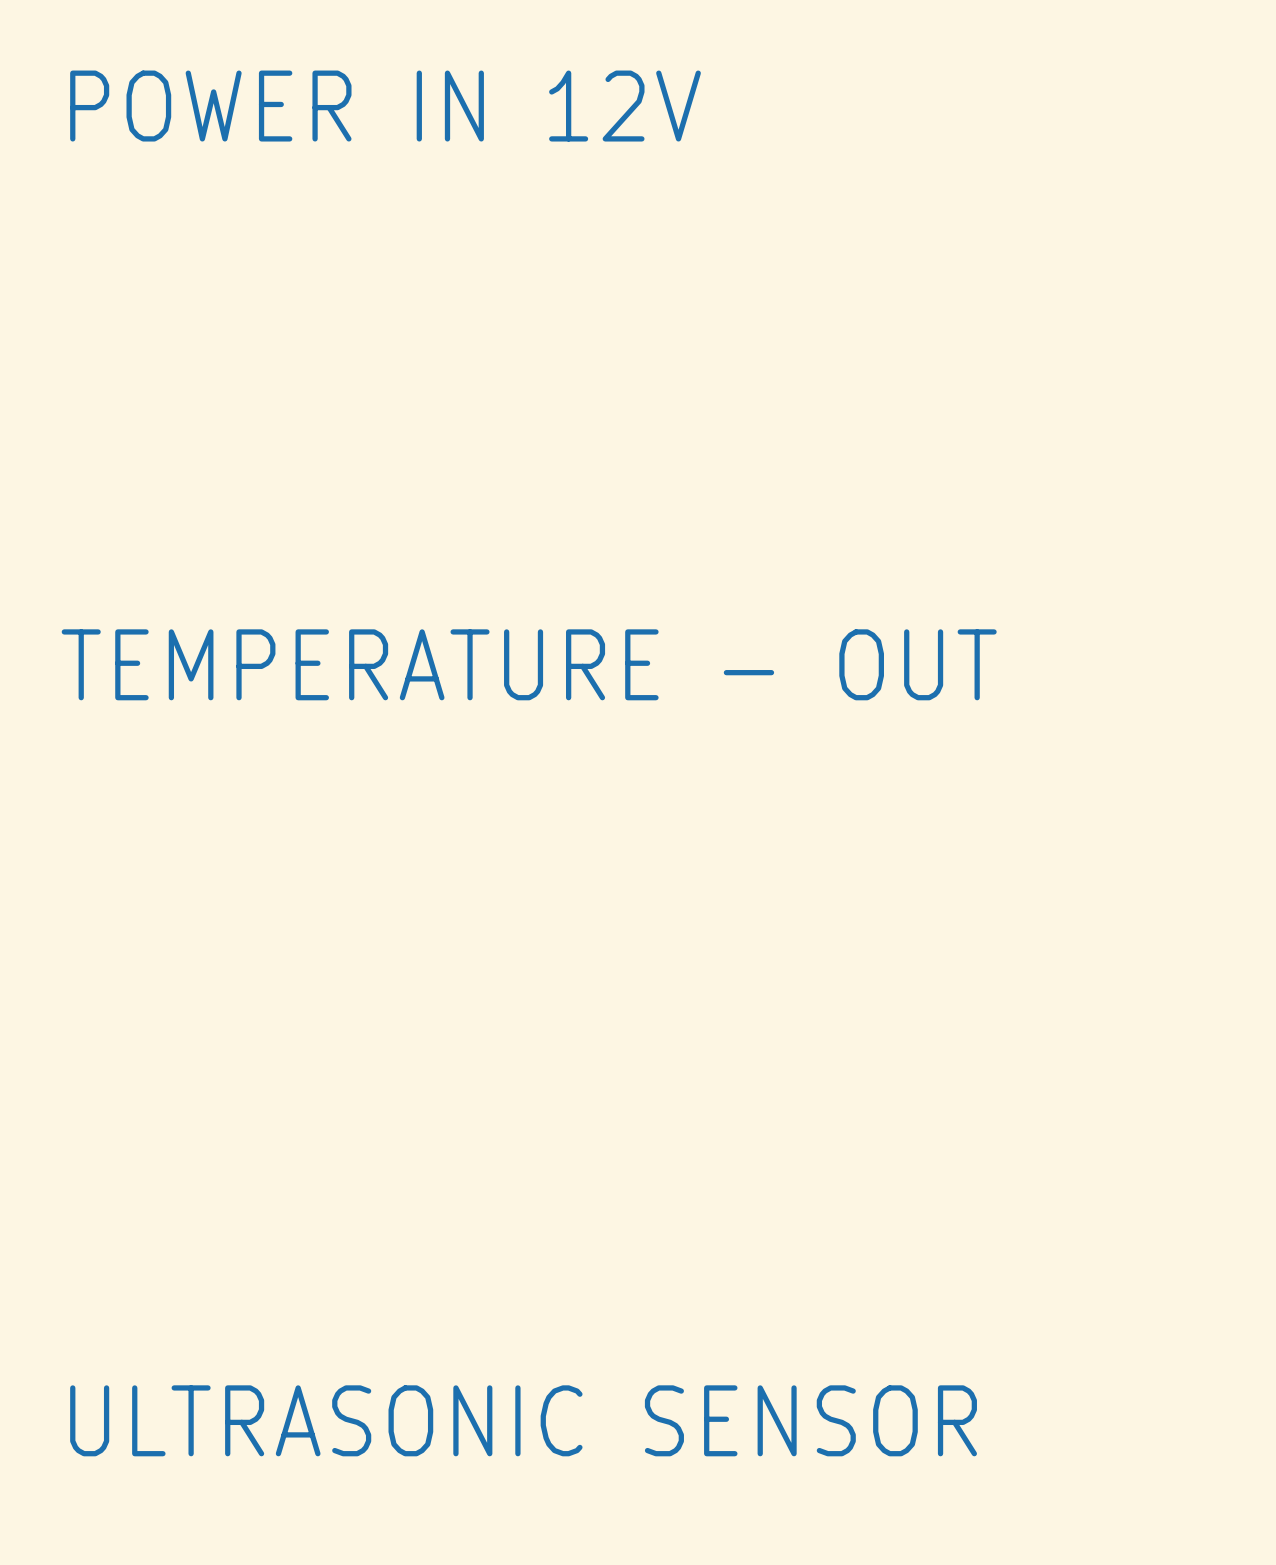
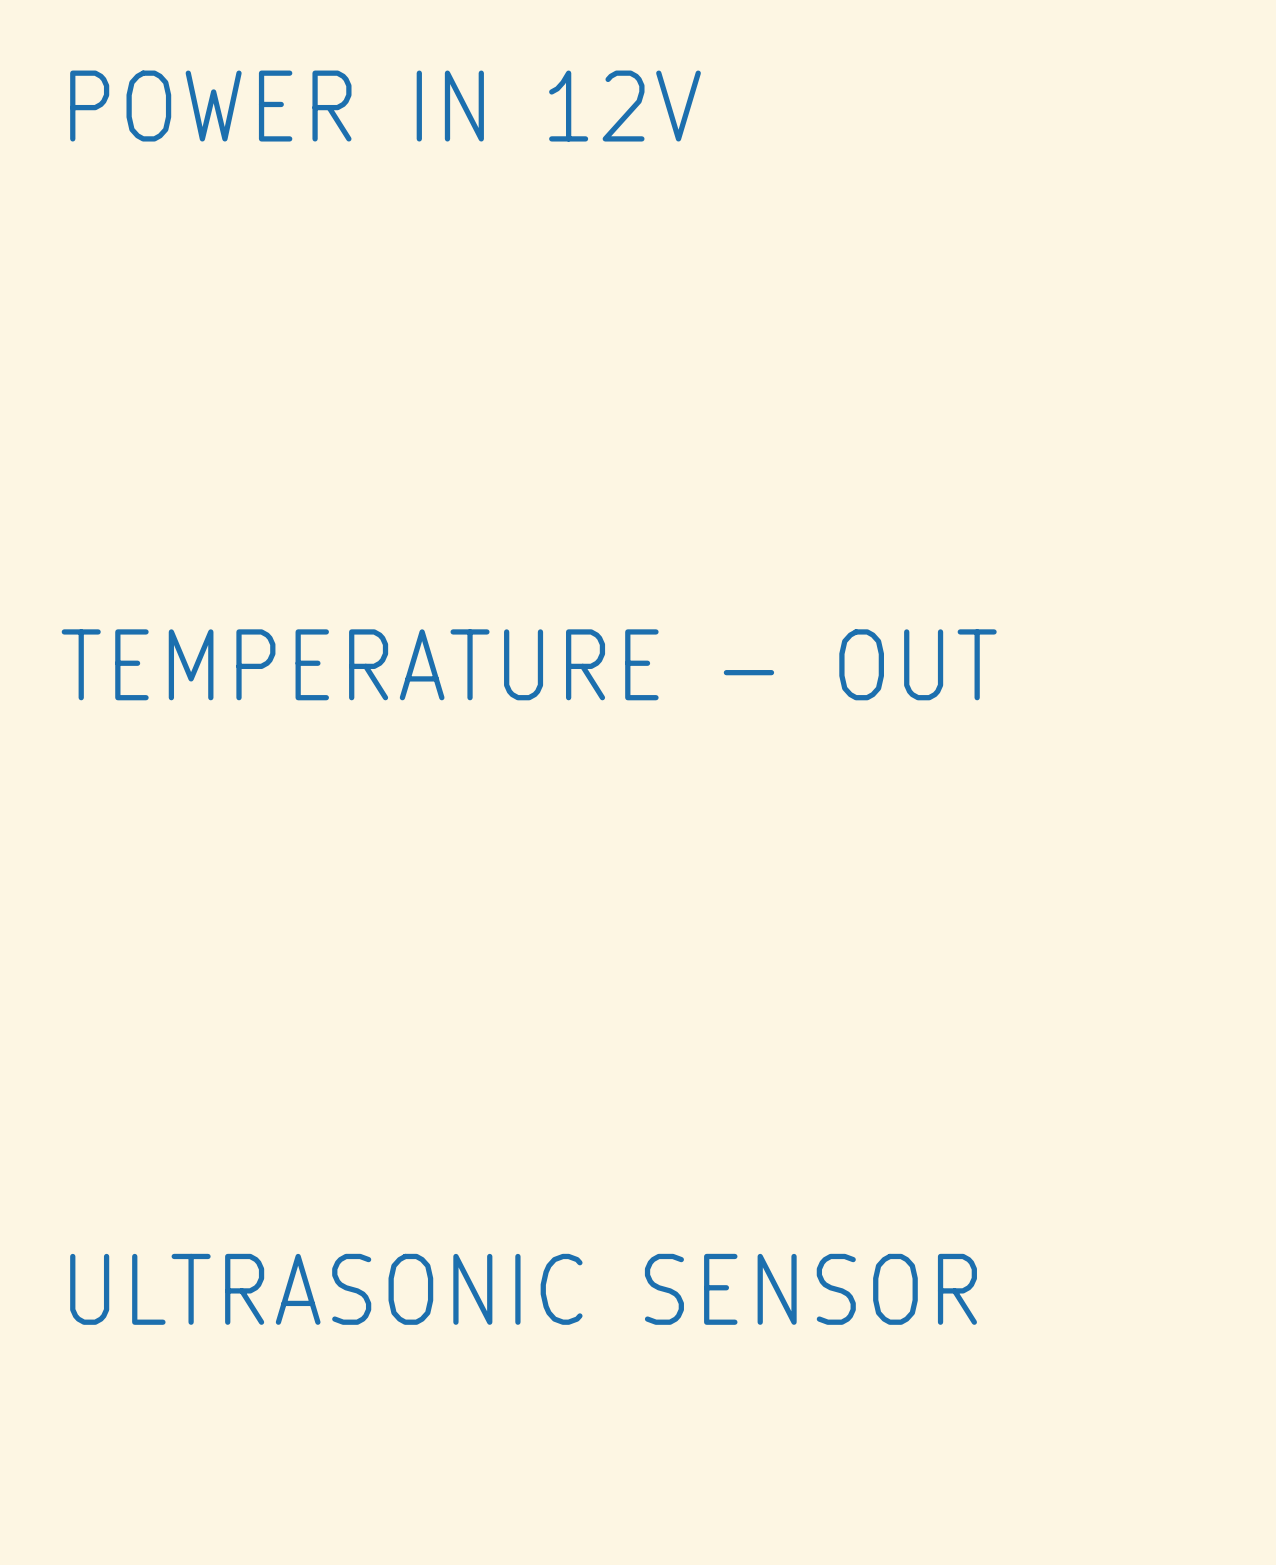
text position: ULTRASONIC SENSOR (523, 1420) -> ULTRASONIC SENSOR (523, 1289)

